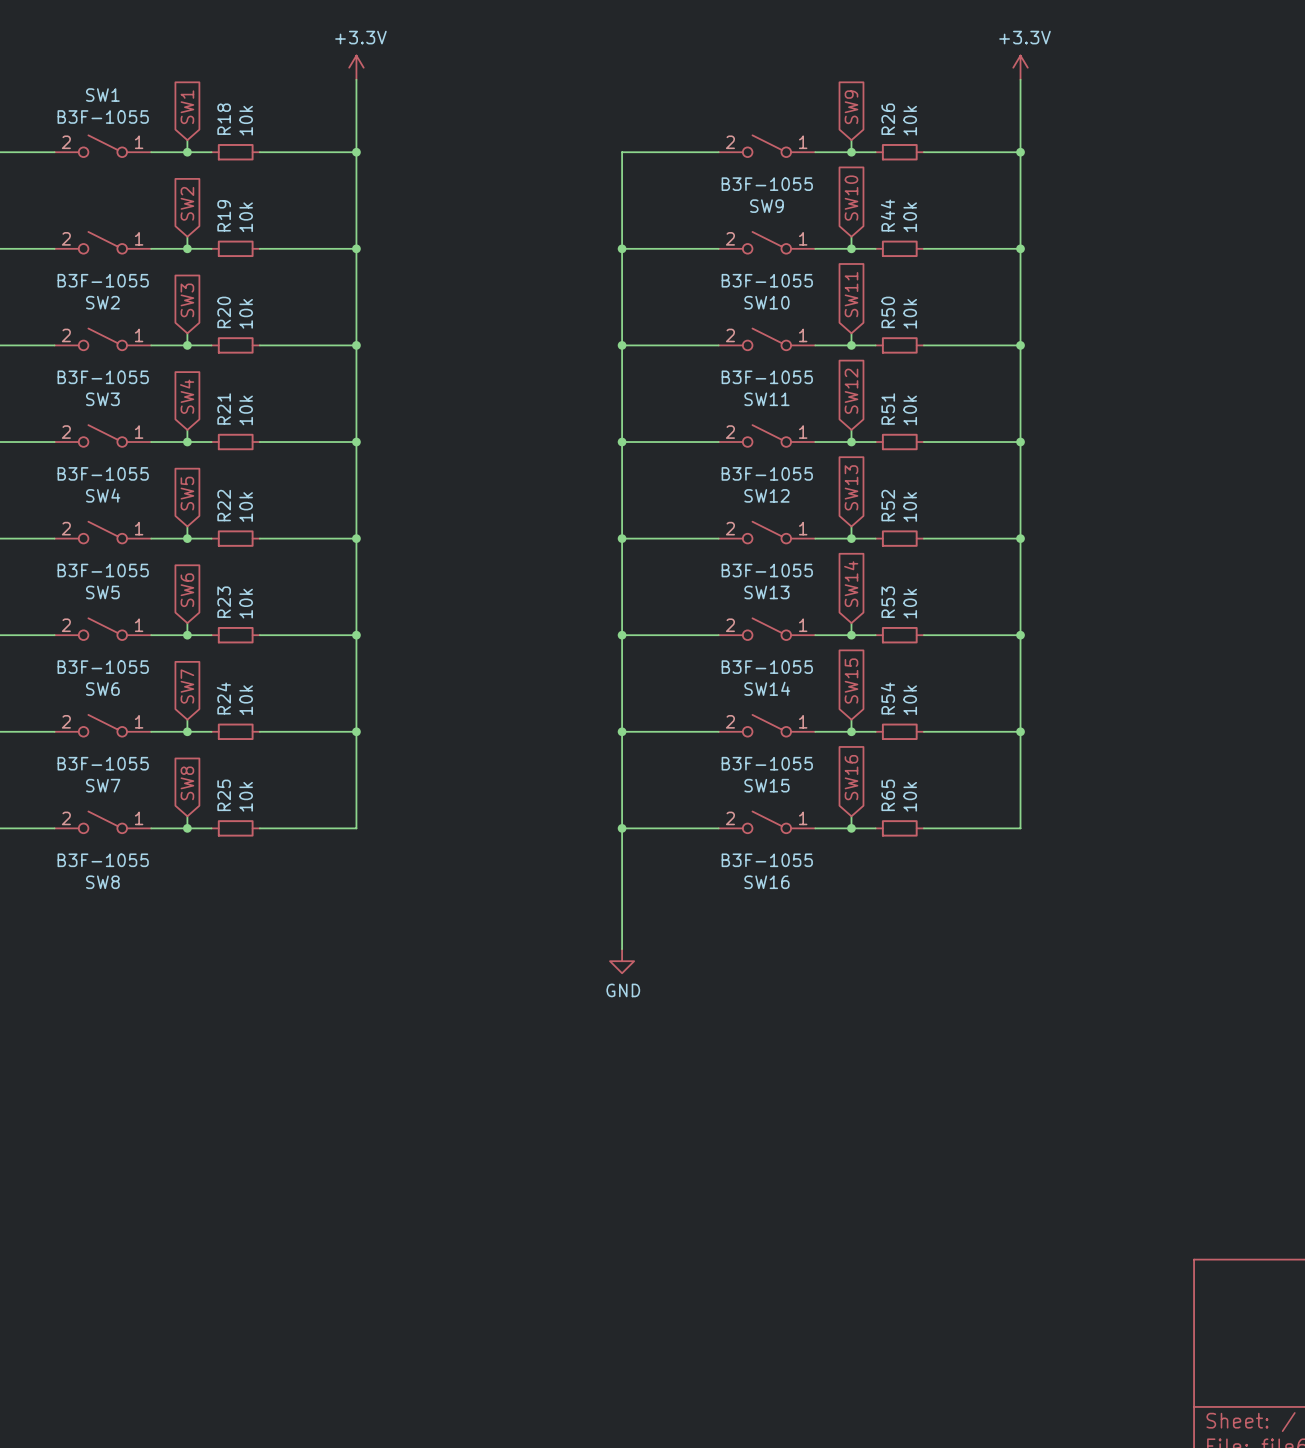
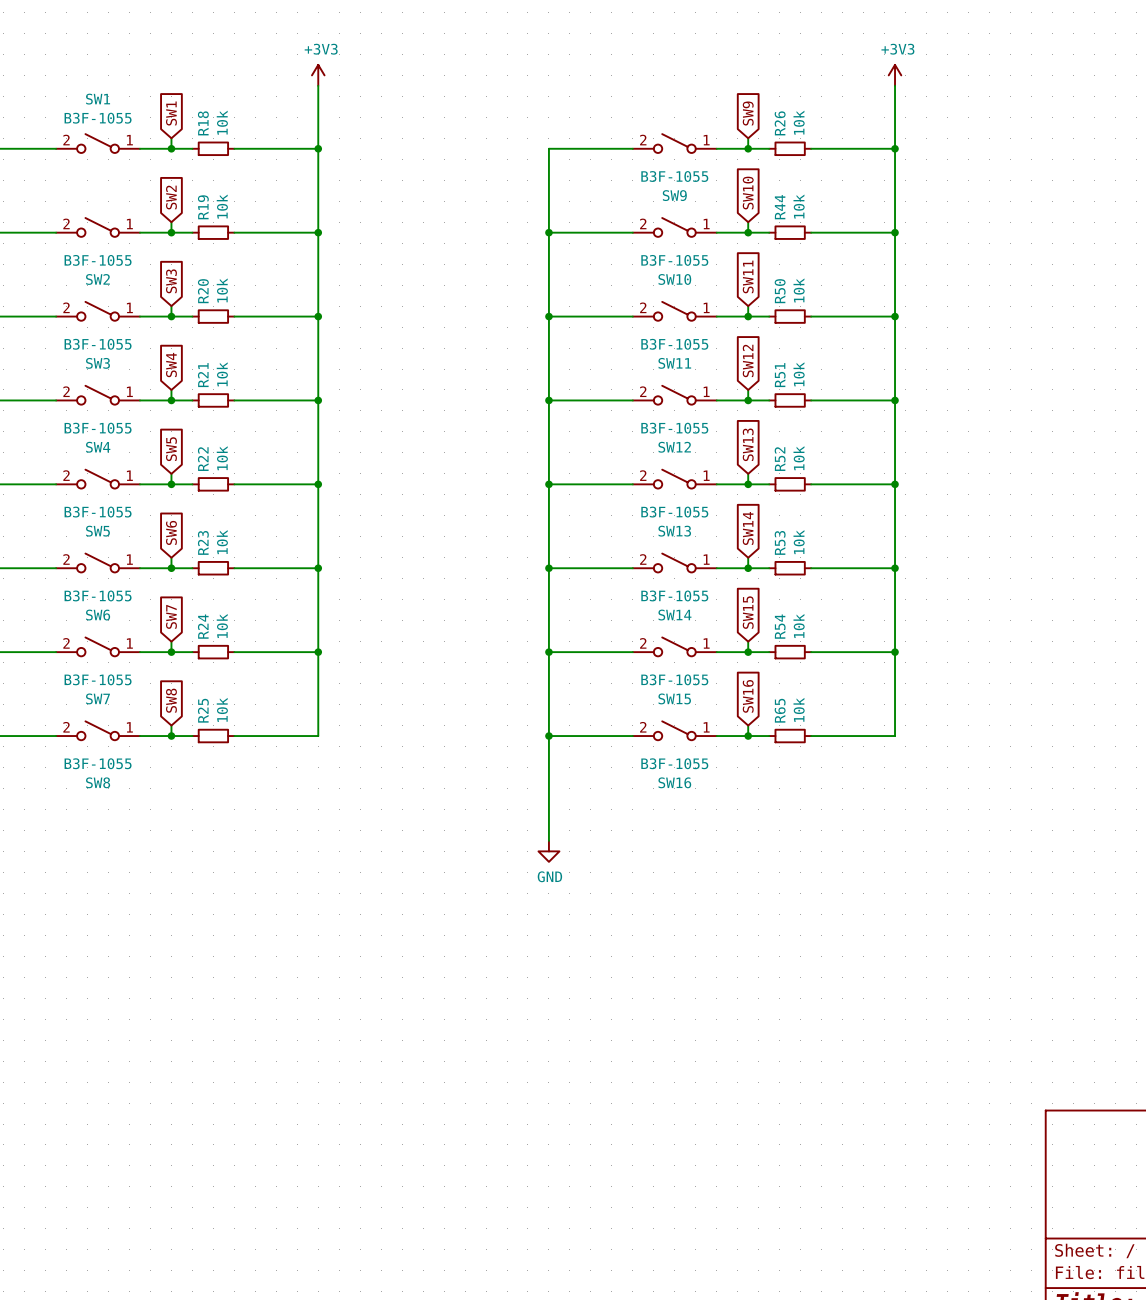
power symbol: +3.3V (356, 67) -> +3V3 (318, 75)
power symbol: +3.3V (1020, 67) -> +3V3 (895, 75)

